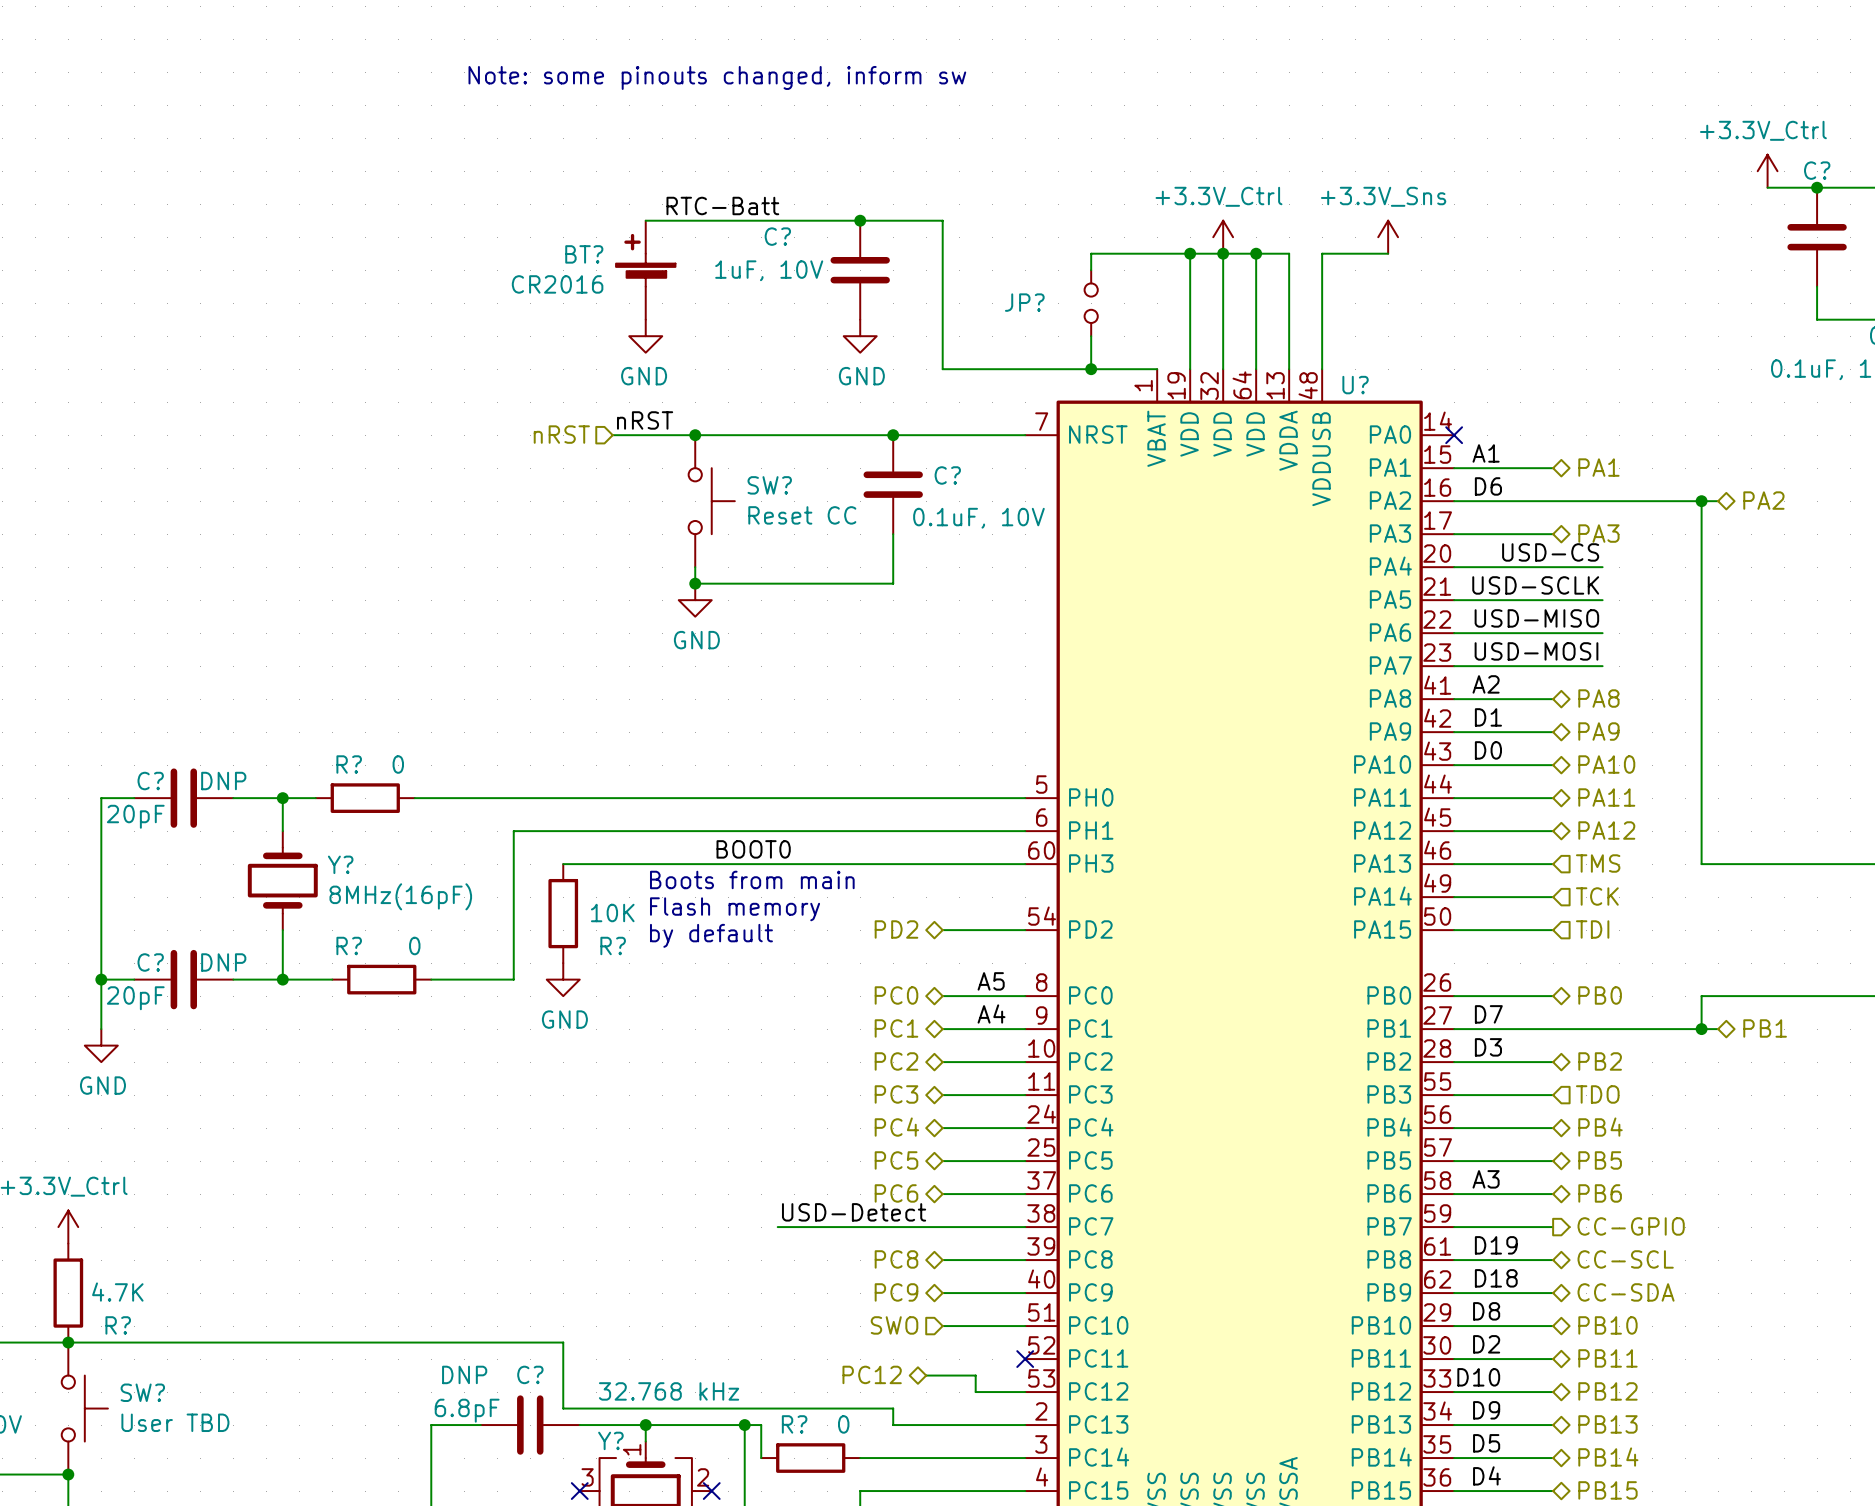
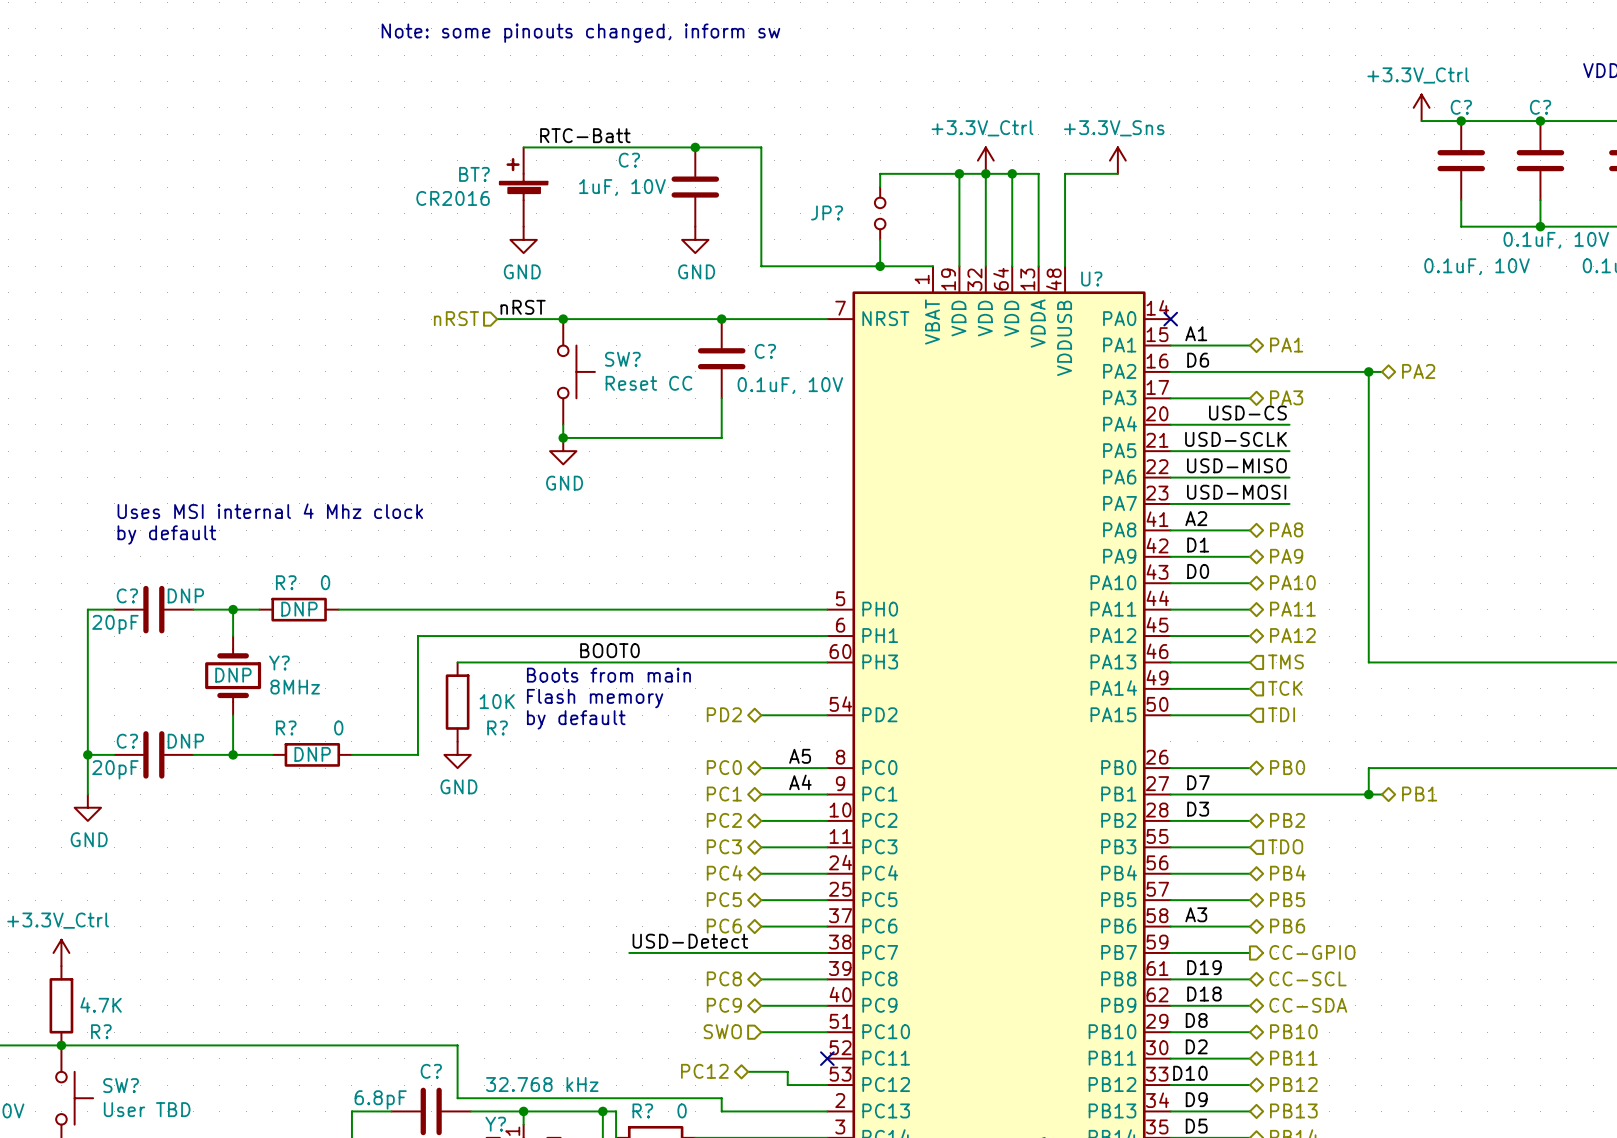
text: none -> Uses MSI internal 4 Mhz clock (270, 511)
text: none -> by default (166, 534)
R? text: none -> DNP (299, 609)
Y? text: none -> DNP (233, 675)
Y? value: 8MHz(16pF) (400, 896) -> 8MHz (295, 687)
R? text: none -> DNP (312, 754)
C? text: DNP (464, 1374) -> none

